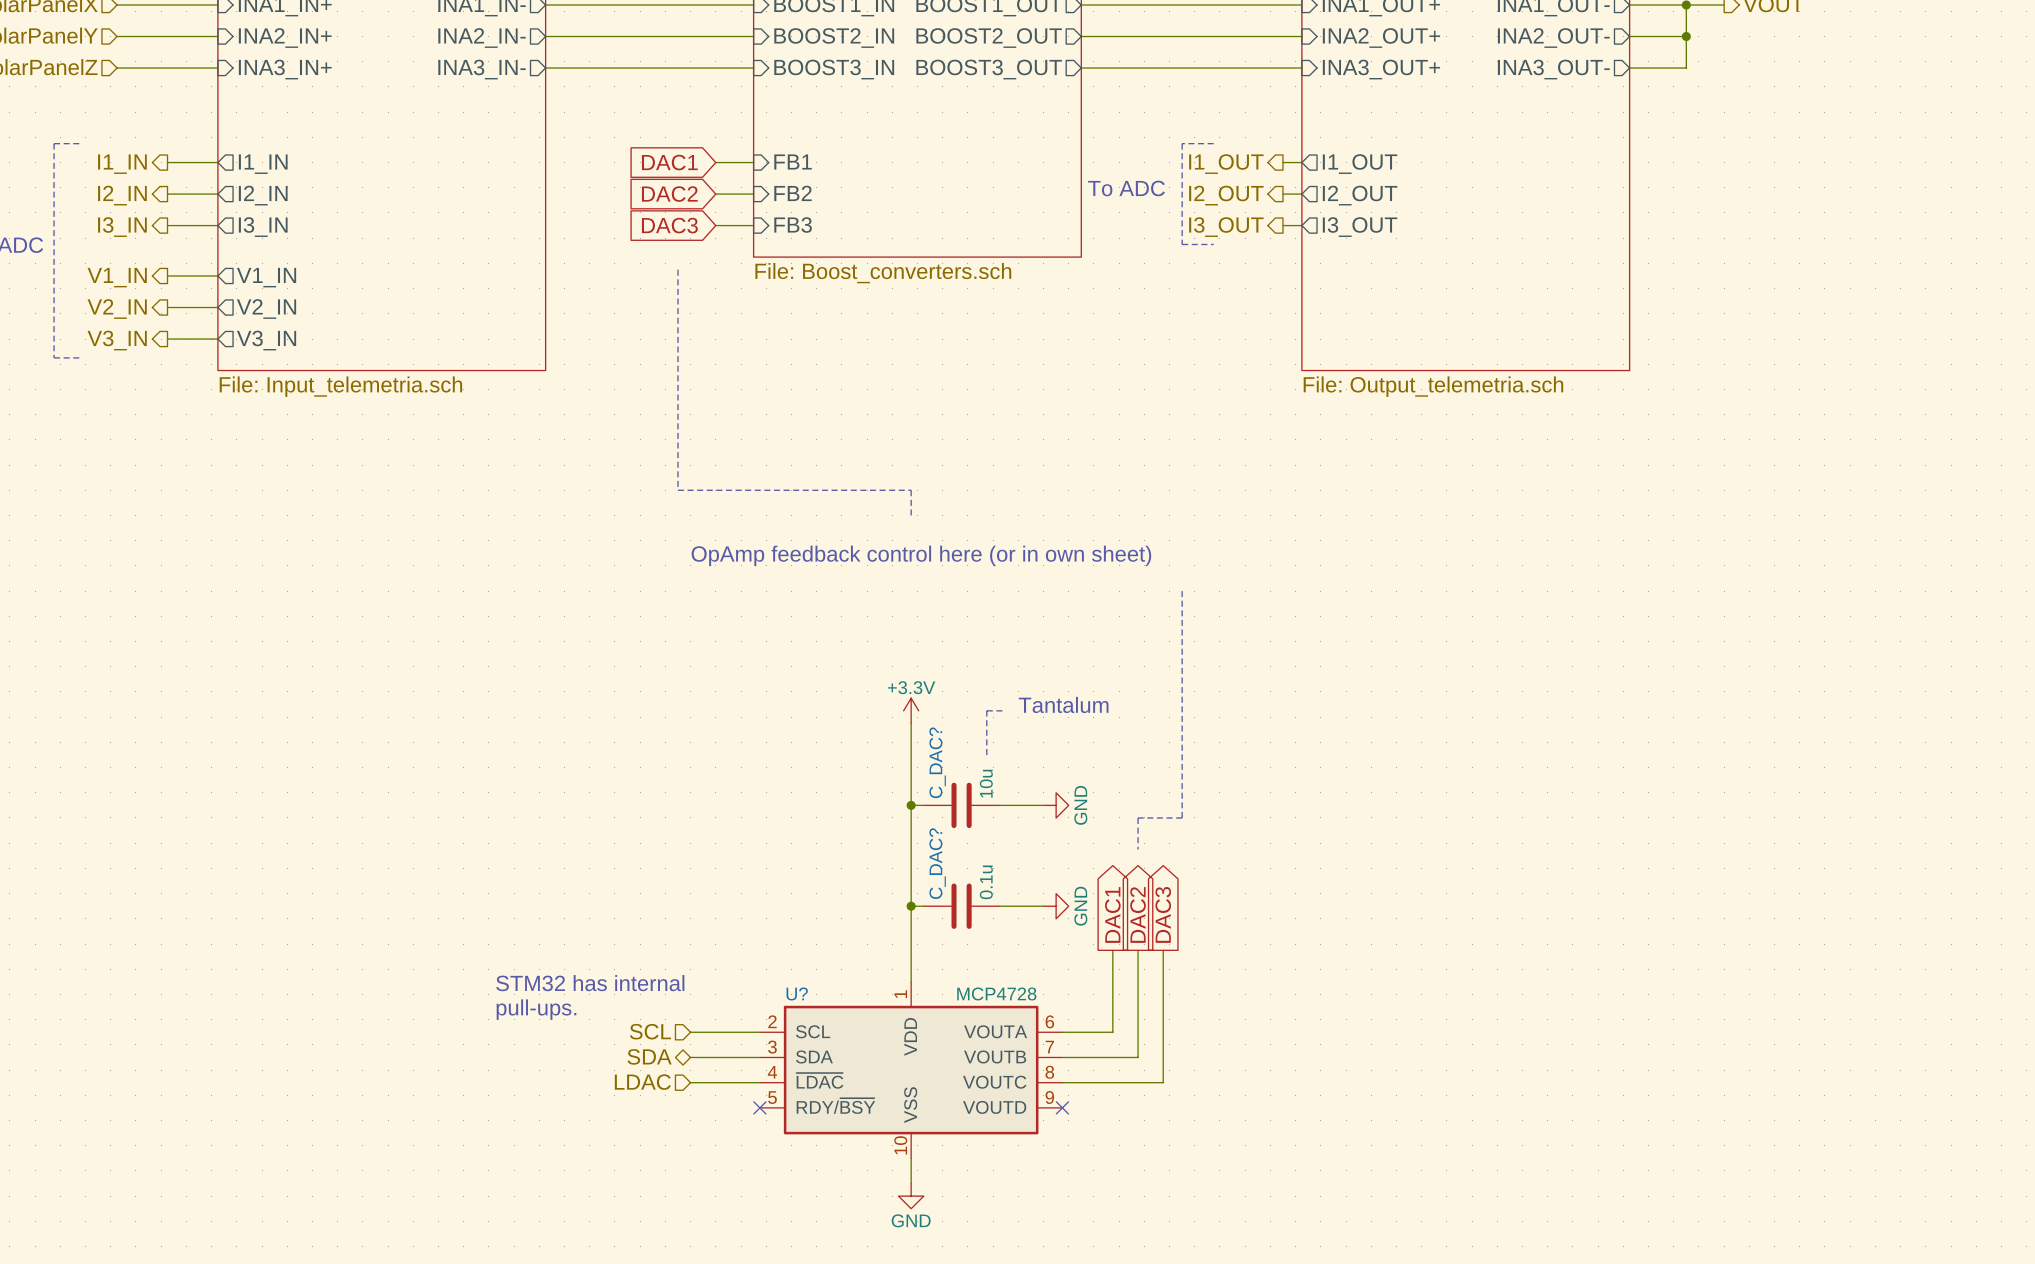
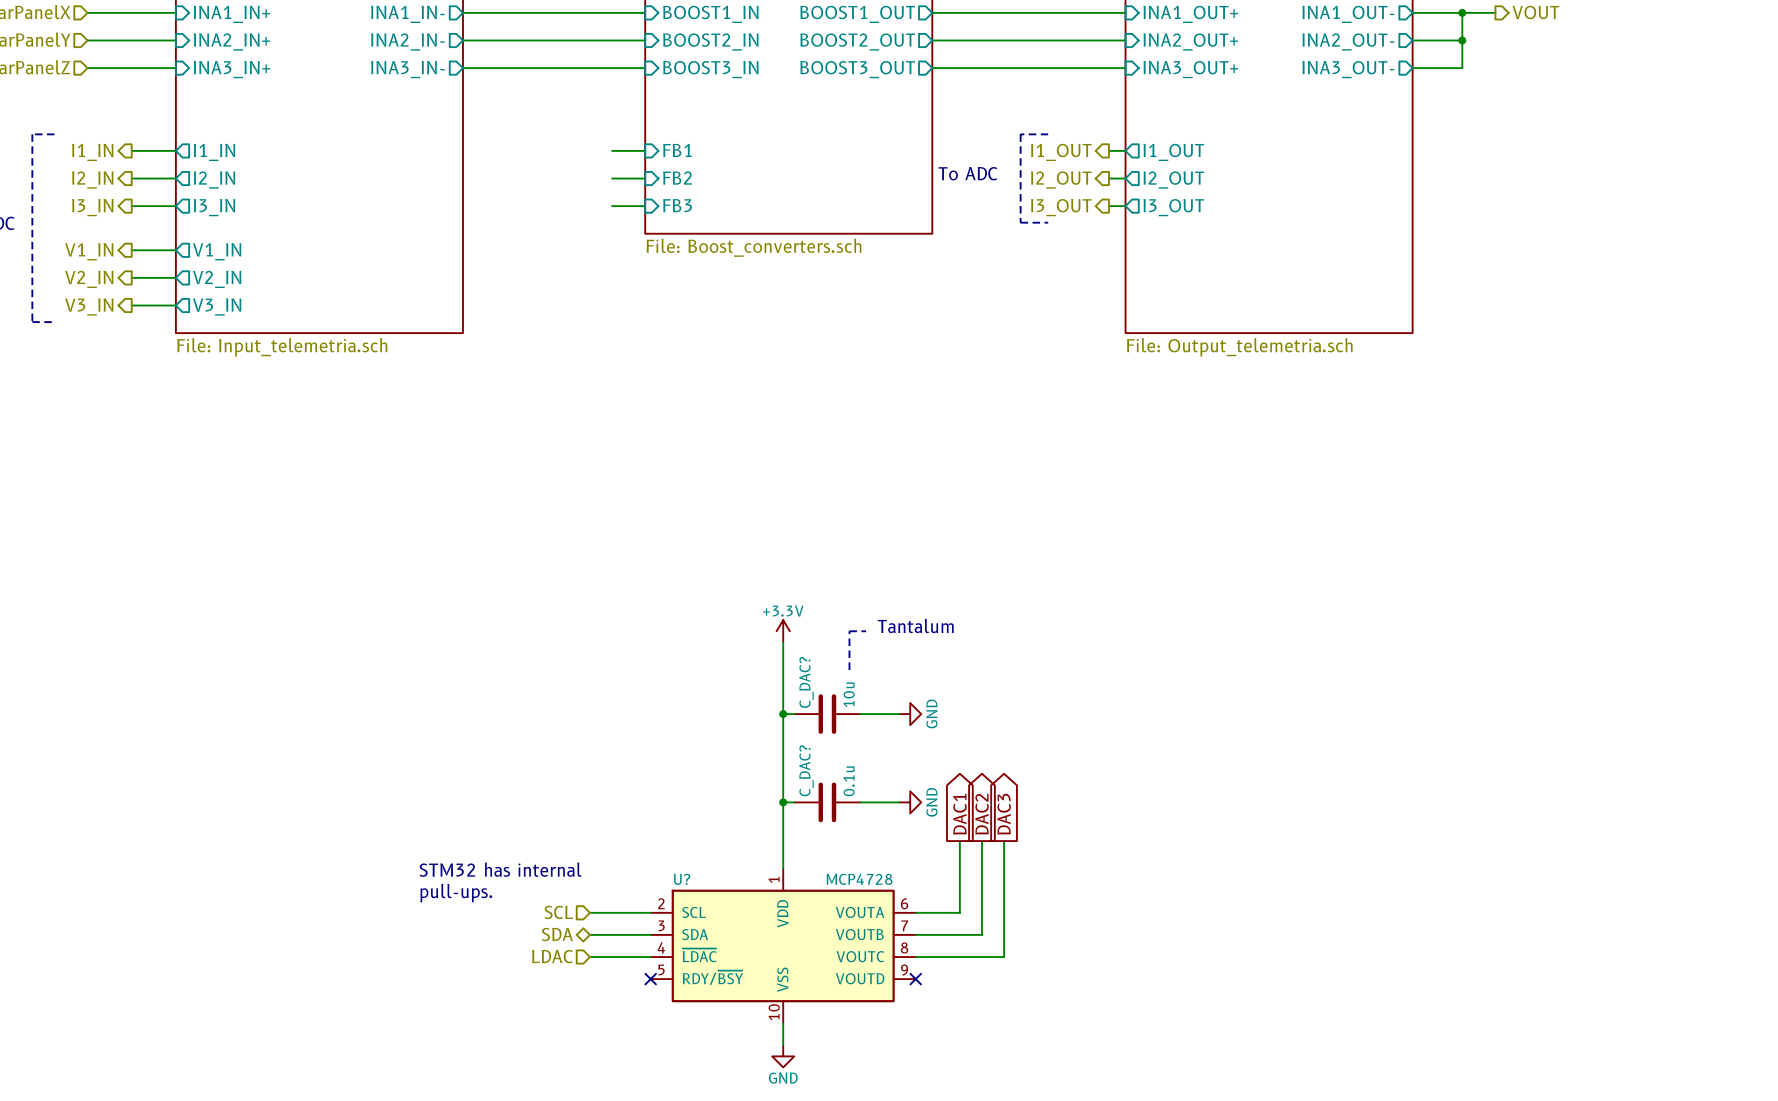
global label: DAC1 (669, 162) -> none
global label: DAC2 (669, 194) -> none
global label: DAC3 (669, 225) -> none
line: (677, 269) (677, 490) (911, 490) (911, 515) -> none
text: OpAmp feedback control here (or in own sheet) (921, 555) -> none
line: (1182, 591) (1182, 817) (1138, 817) (1138, 849) -> none

